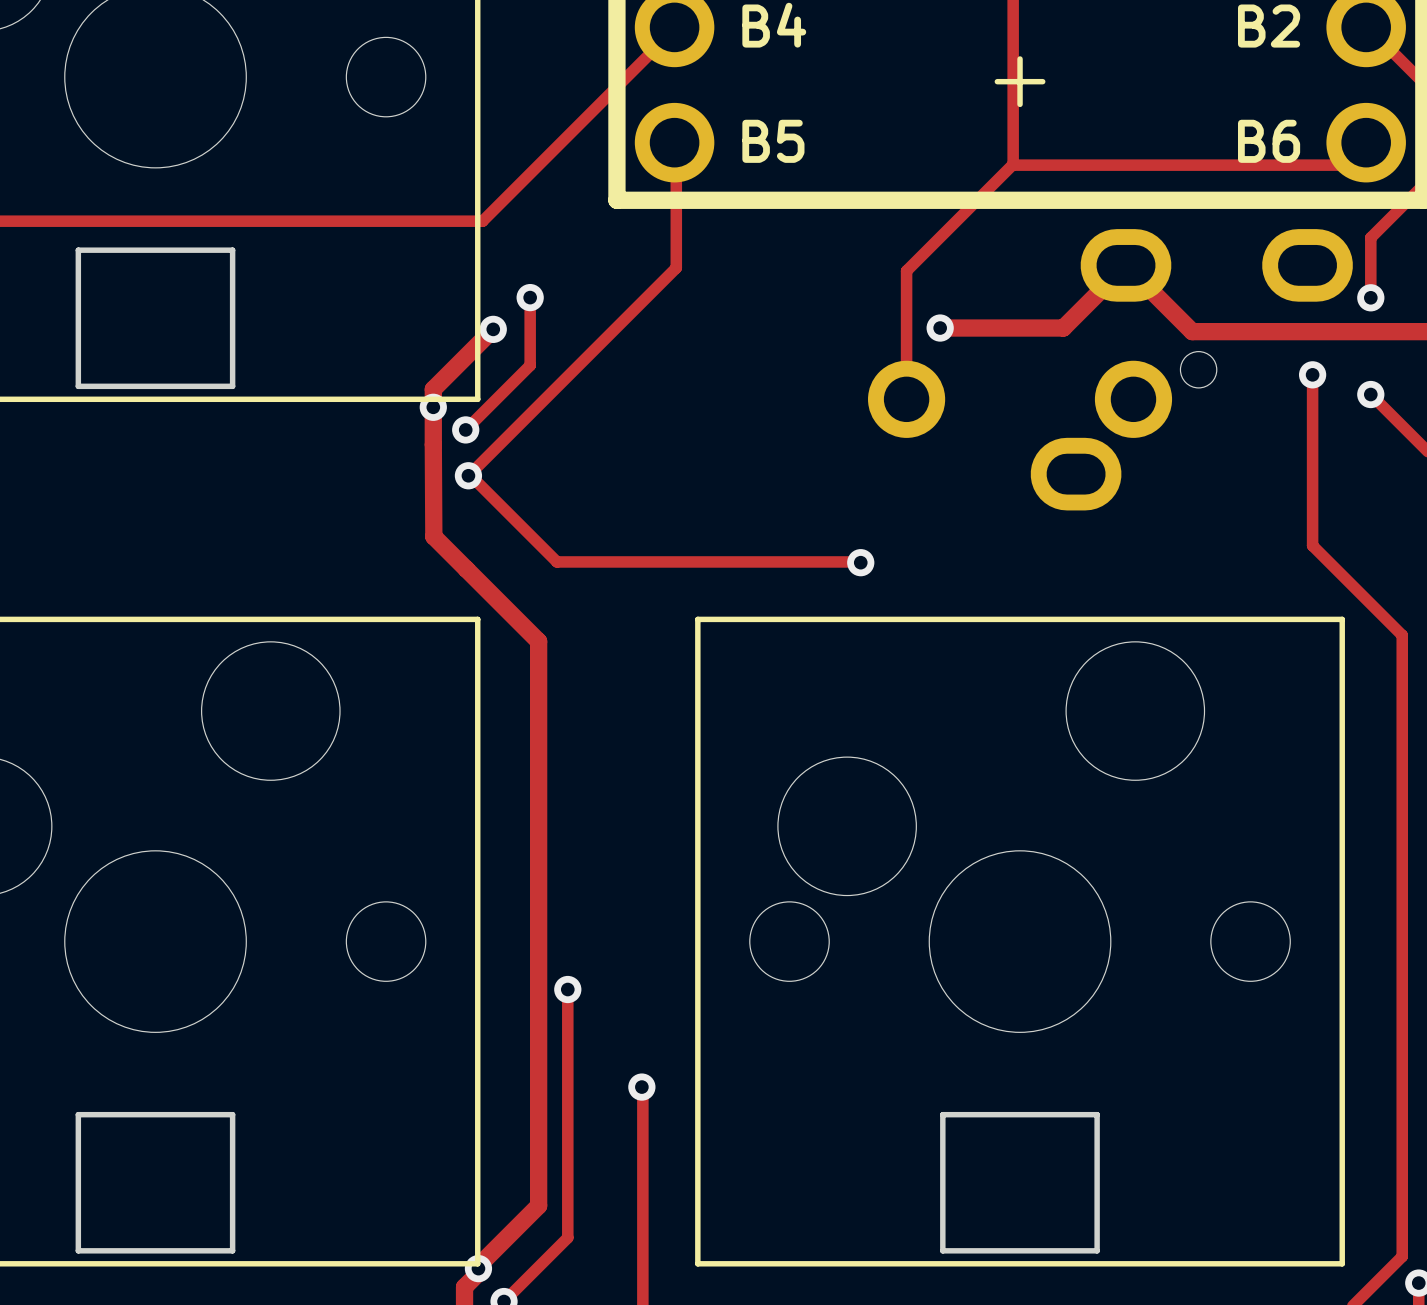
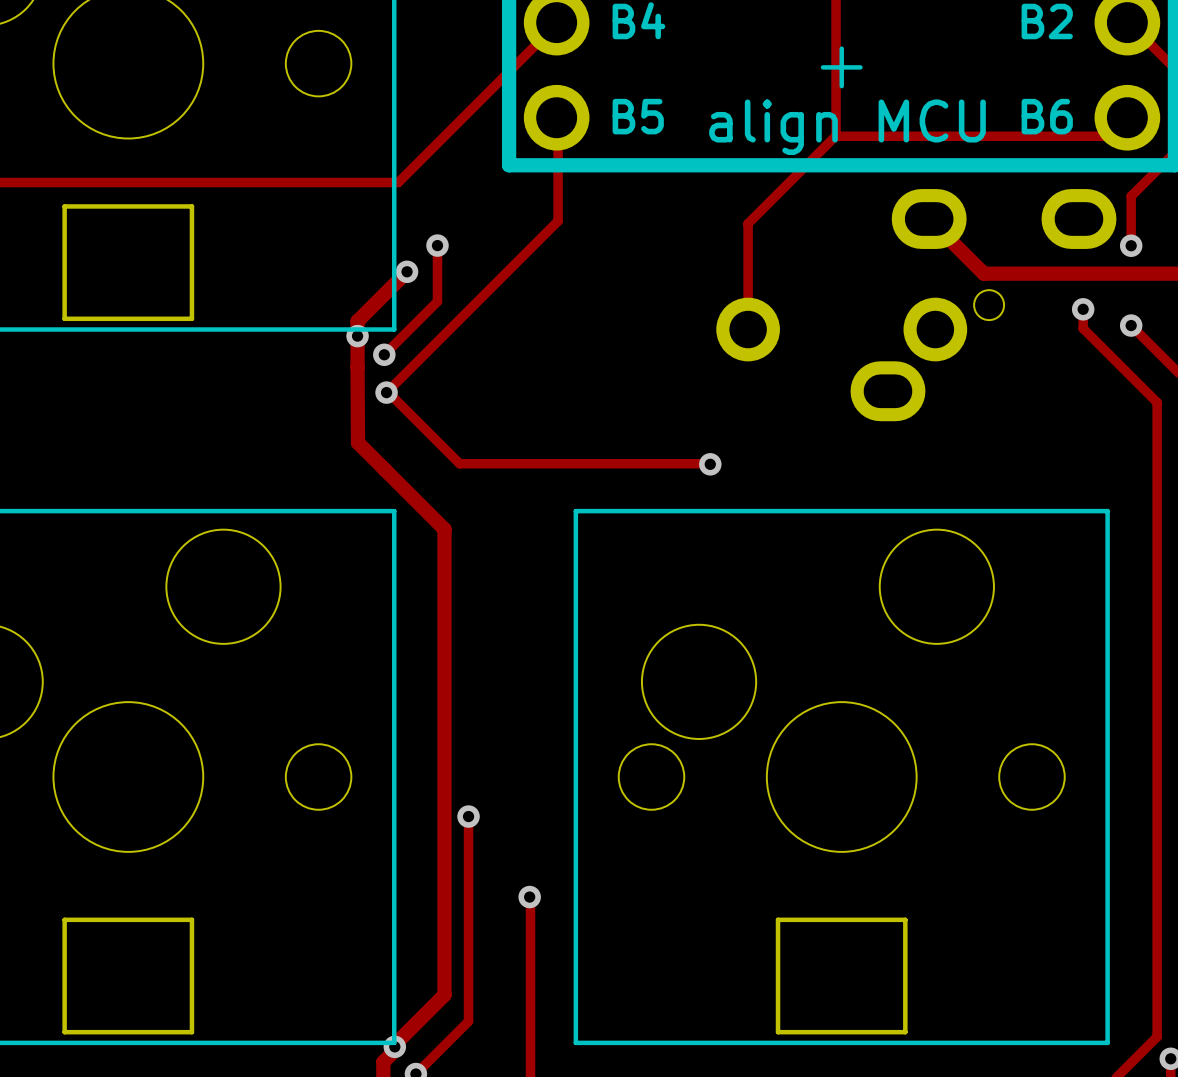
text: none -> align MCU (847, 127)
track: (1126, 265) (1063, 328) (940, 328) -> none
via: (940, 328) -> none
track: (1312, 398) (1312, 545) (1402, 635) -> (1083, 328) (1157, 402) (1157, 524)

